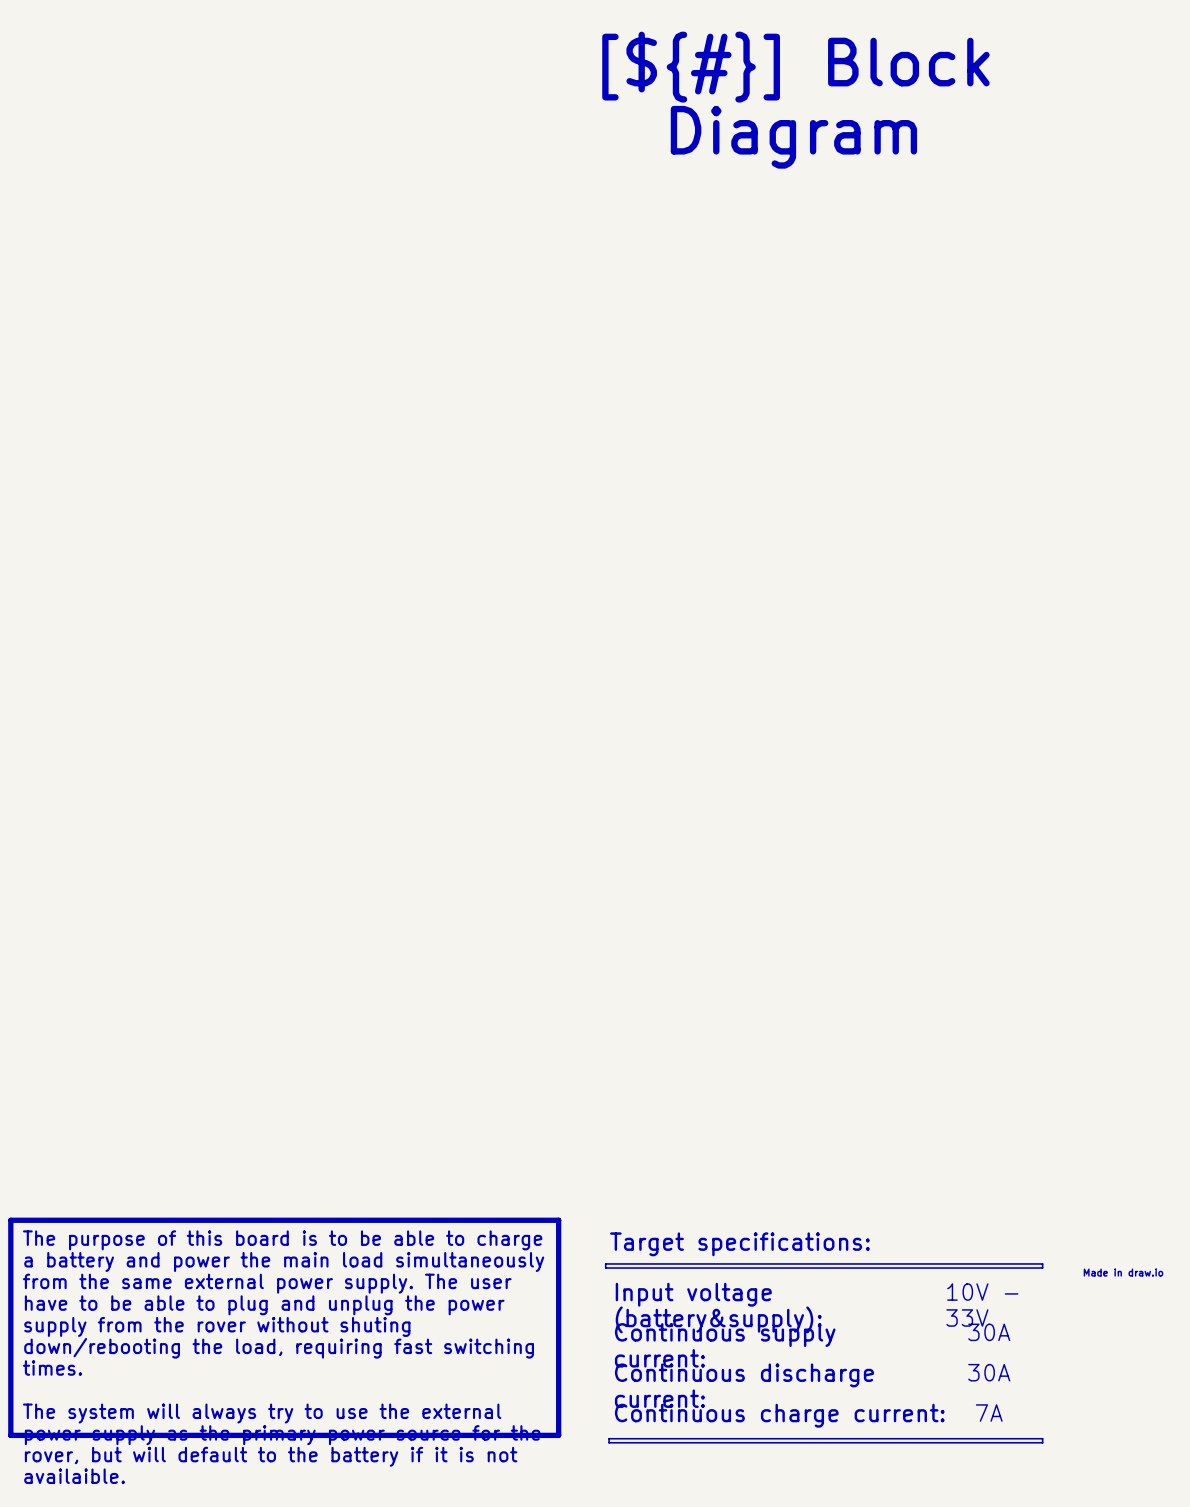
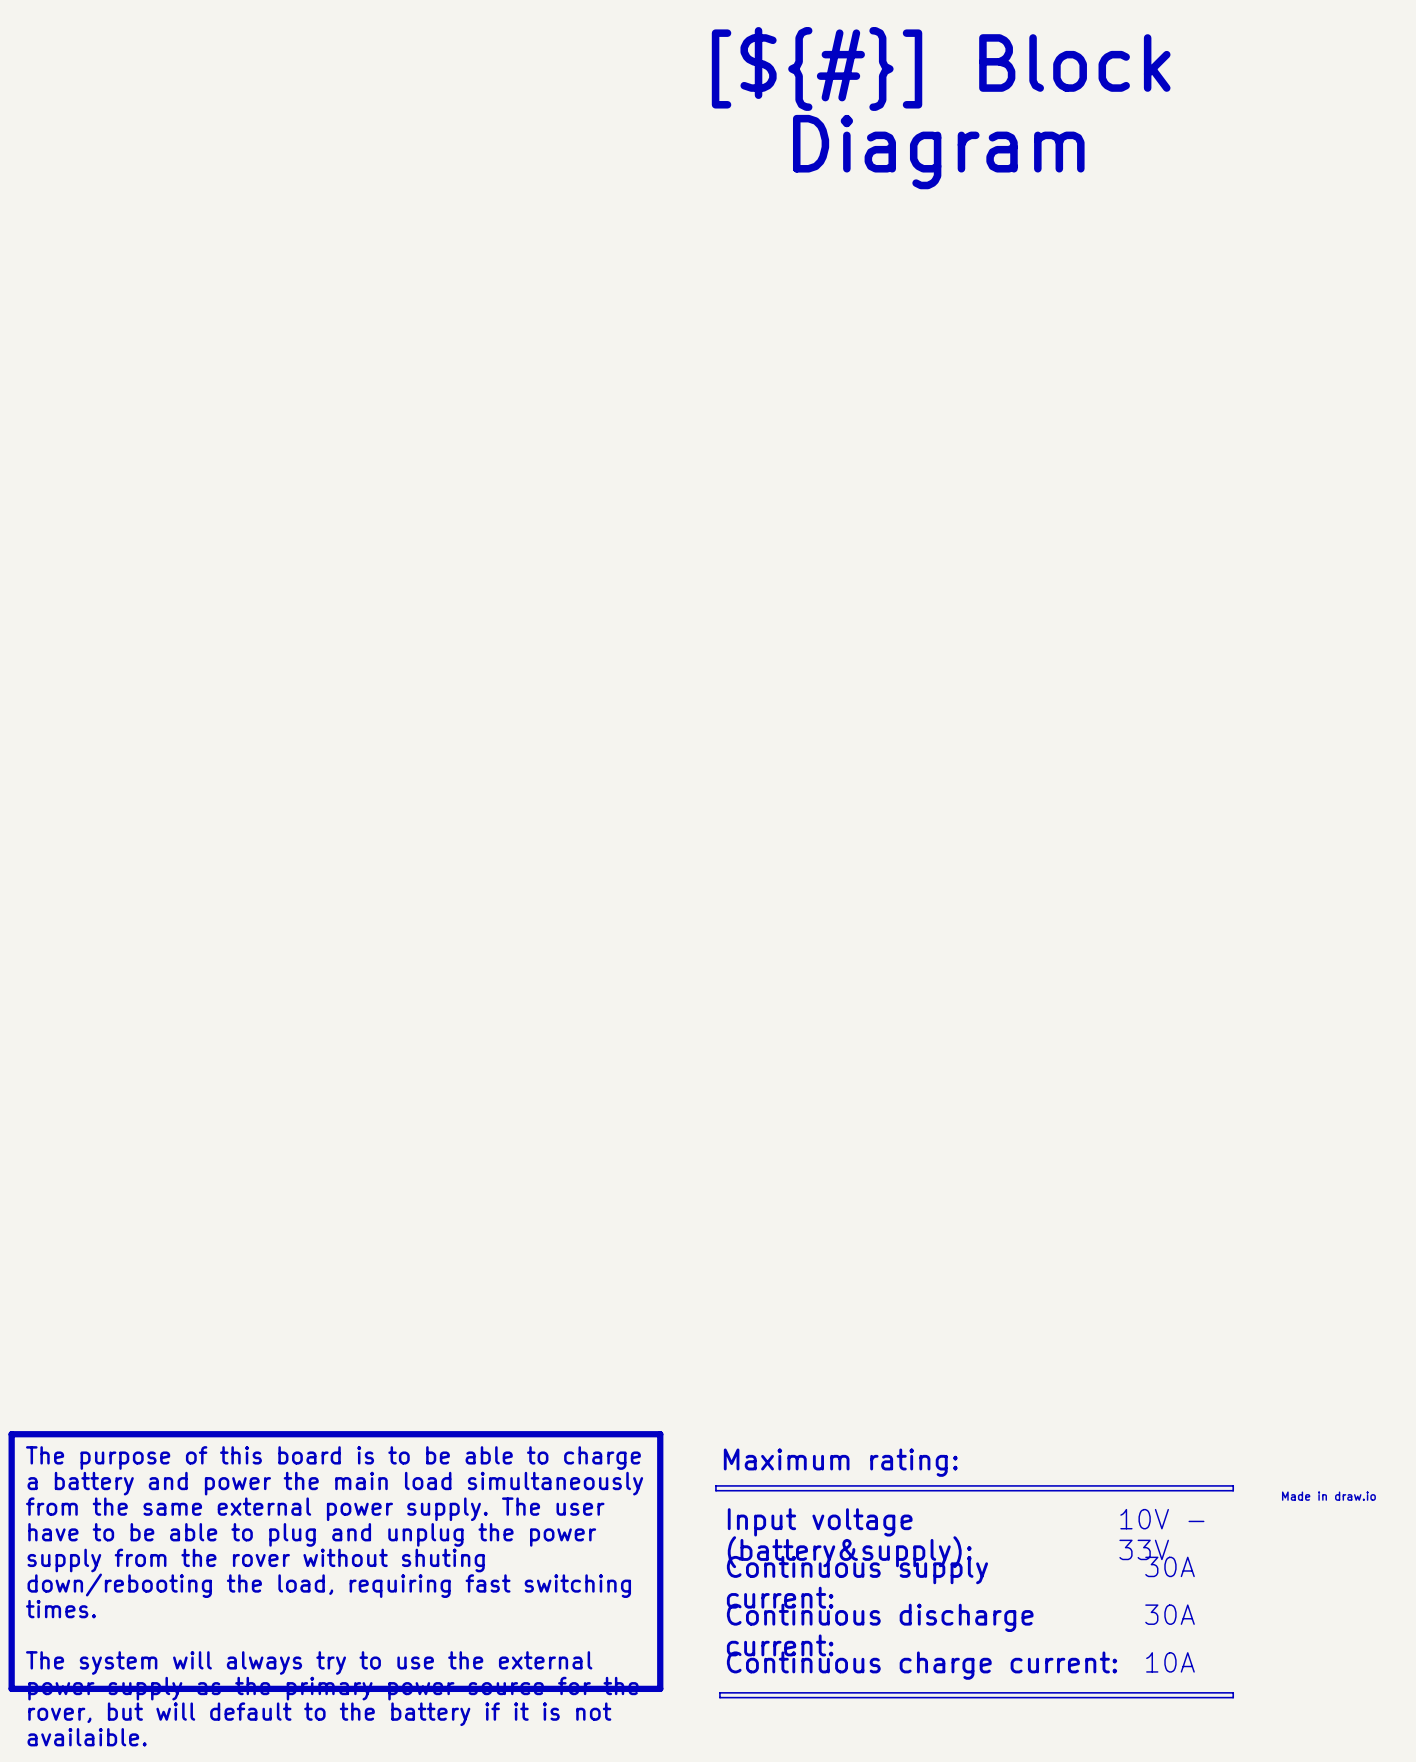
text: Target specifications: (739, 1244) -> Maximum rating: (840, 1462)
text: 7A (989, 1413) -> 10A (1170, 1662)

